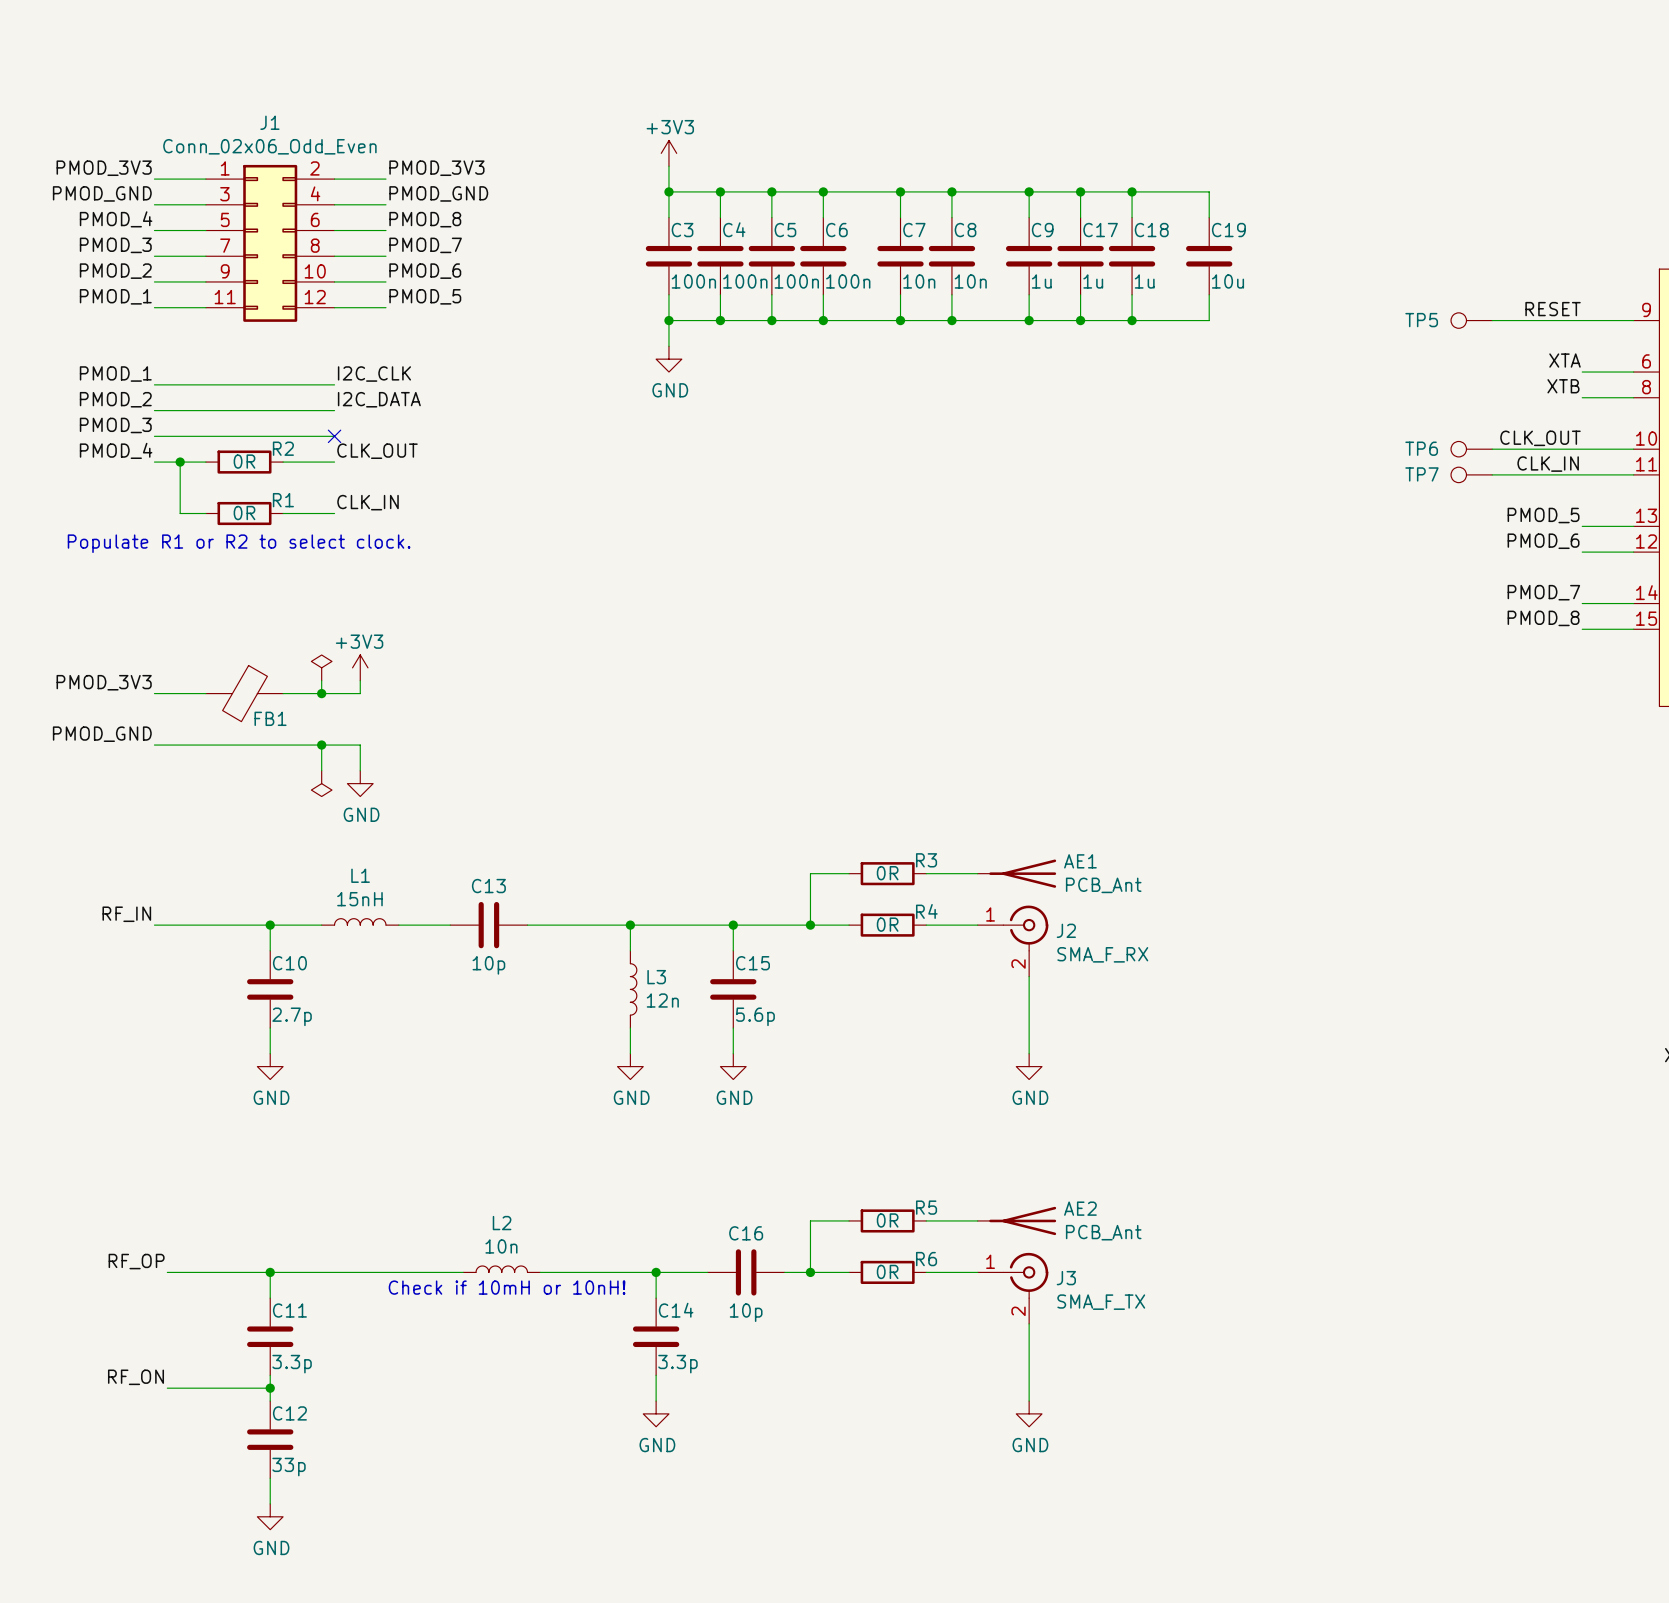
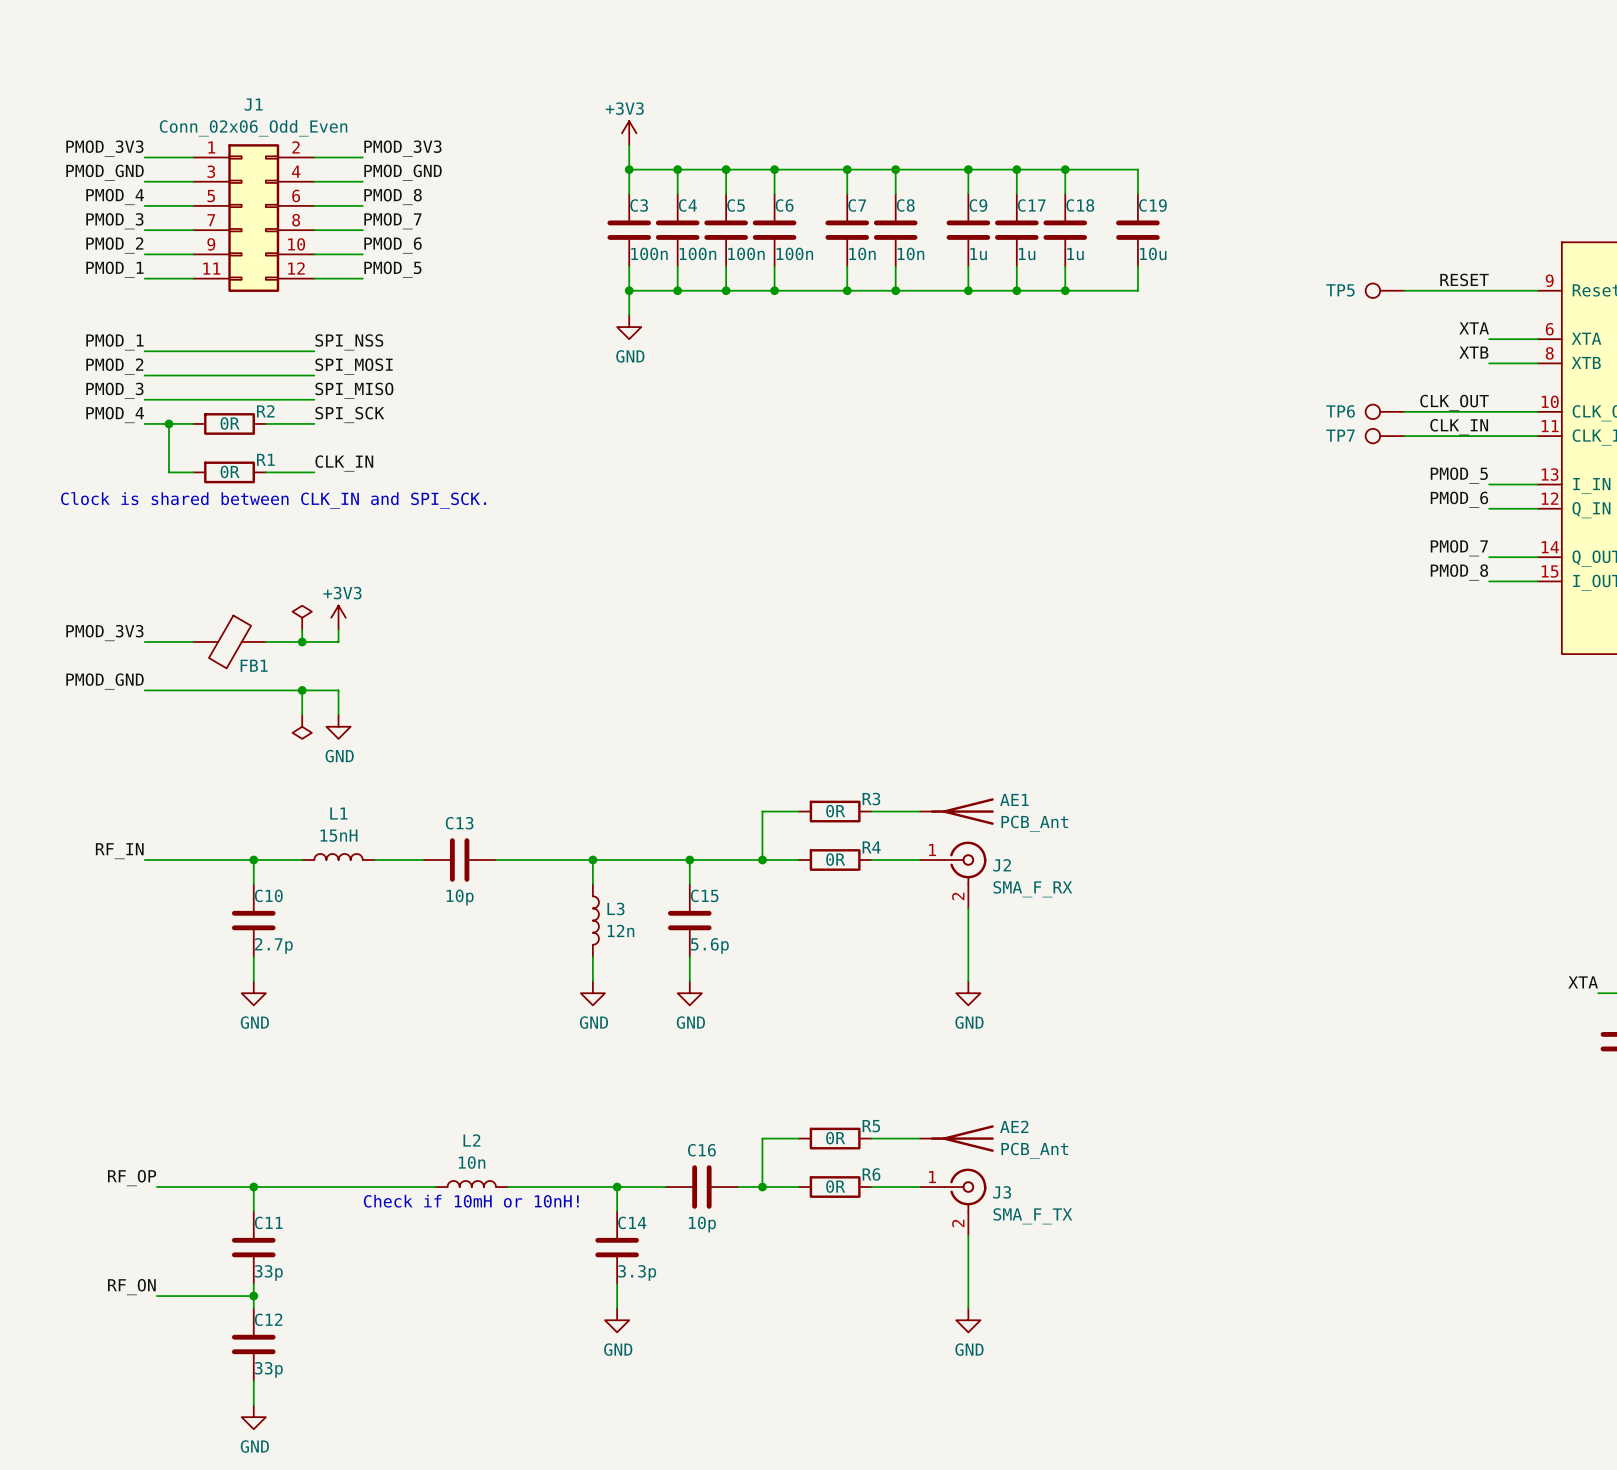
label: I2C_CLK (374, 374) -> SPI_NSS (349, 342)
label: I2C_DATA (379, 399) -> SPI_MOSI (354, 366)
label: none -> SPI_MISO (354, 390)
no-connect mark: (334, 436) -> none
label: CLK_OUT (377, 451) -> SPI_SCK (349, 415)
text: Populate R1 or R2 to select clock. (239, 543) -> Clock is shared between CLK_IN and SPI_SCK. (273, 500)
C11 value: 3.3p (292, 1364) -> 33p (268, 1272)

